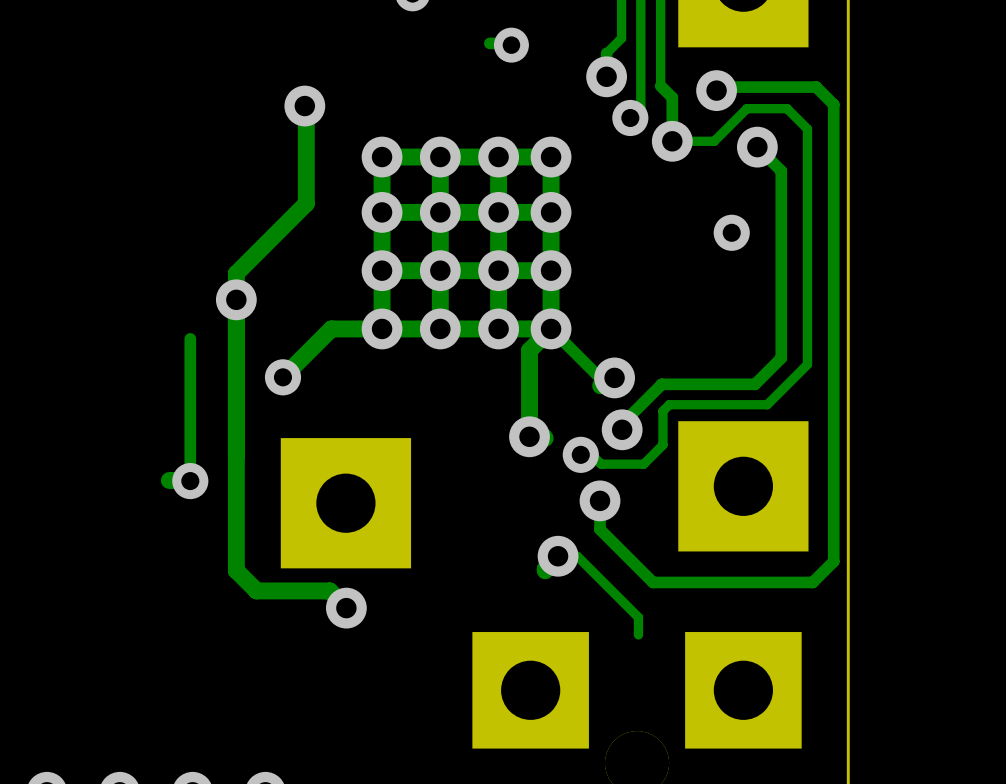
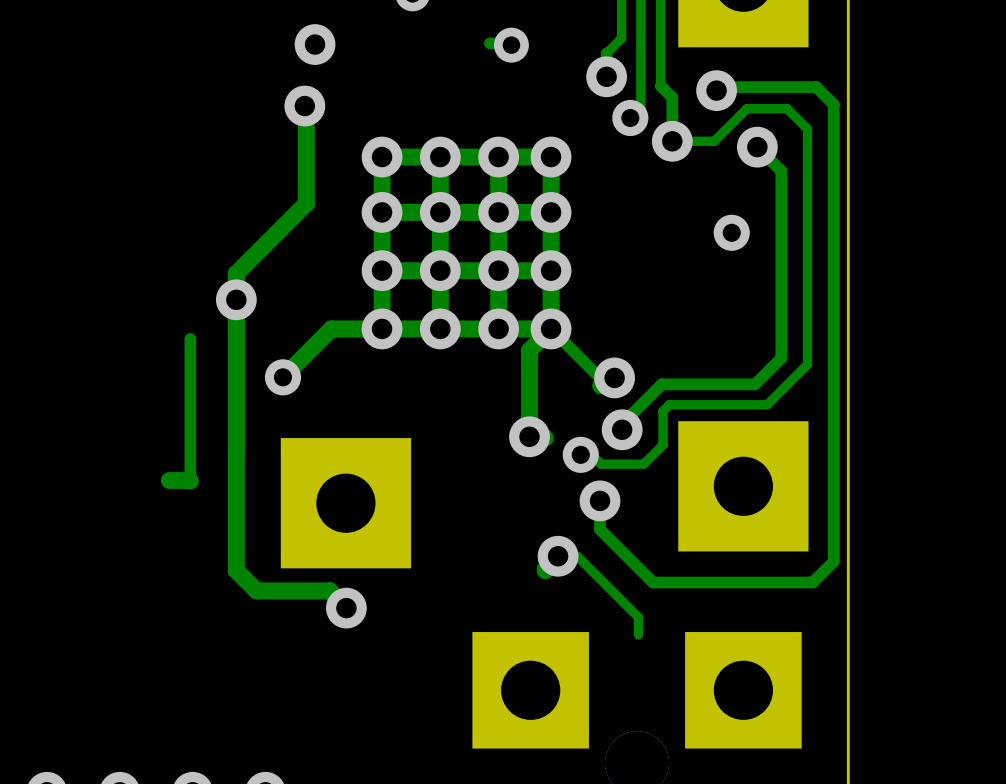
via: none -> (315, 44)
via: (190, 481) -> none

